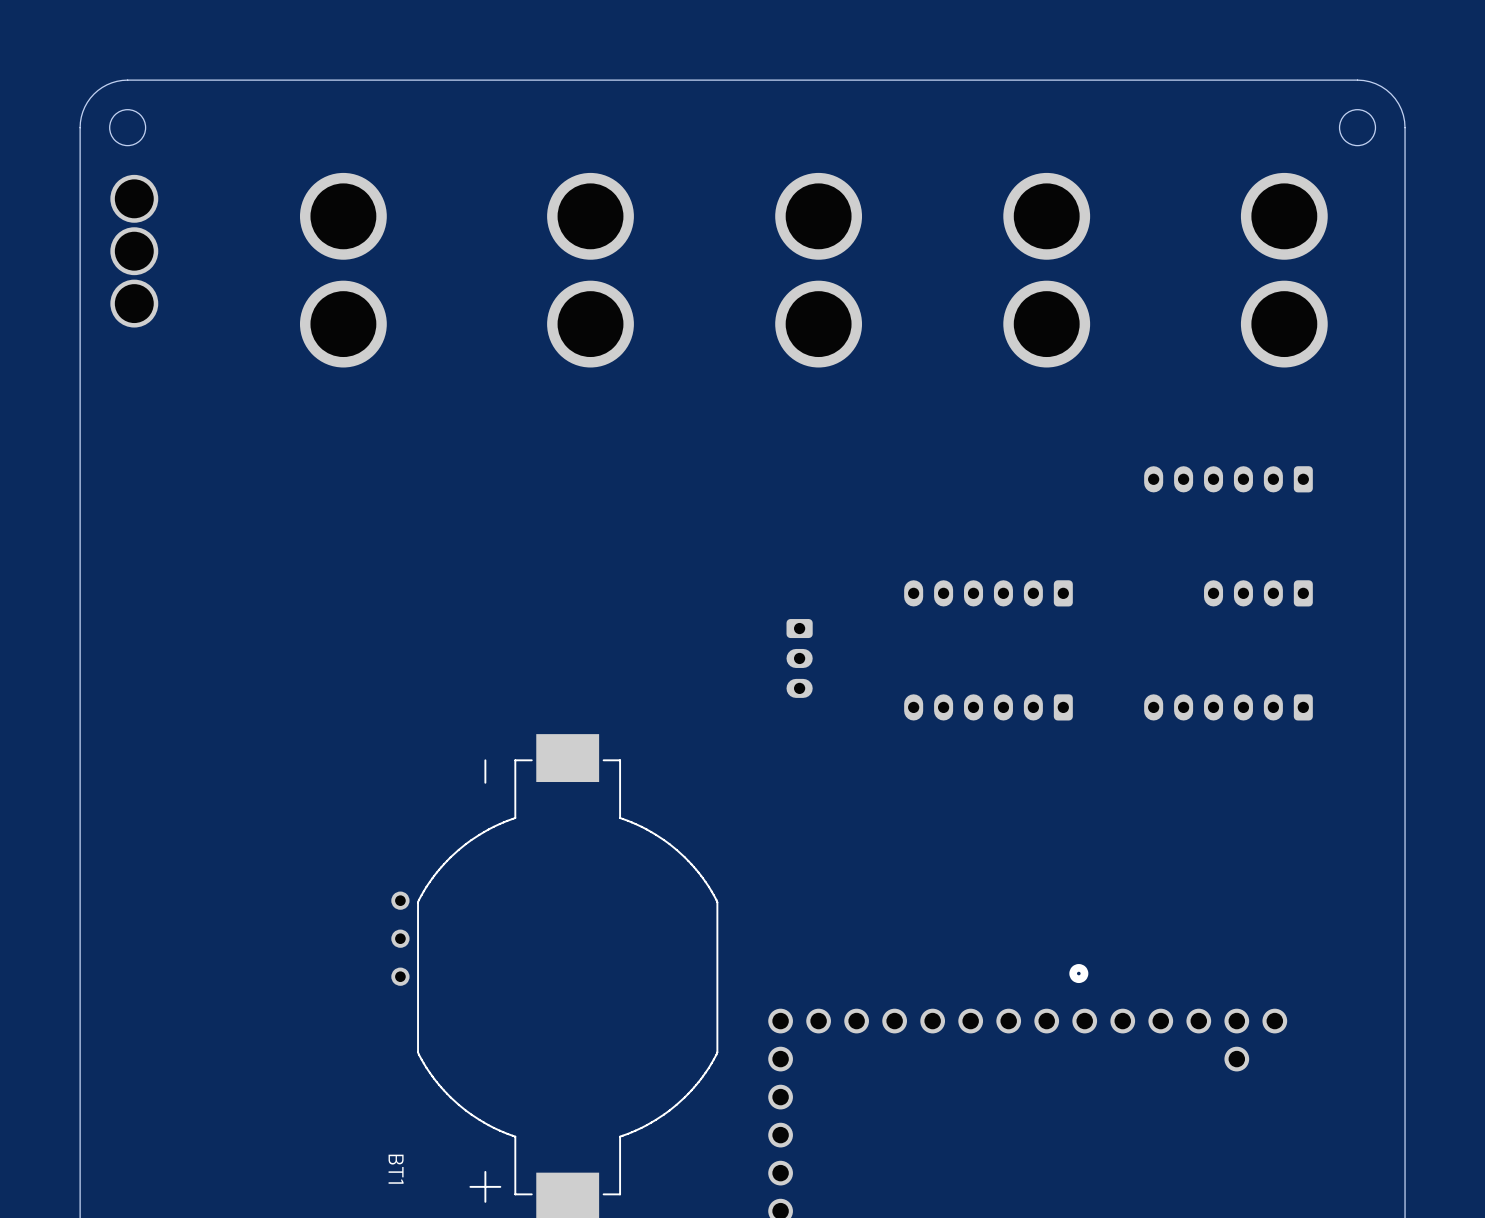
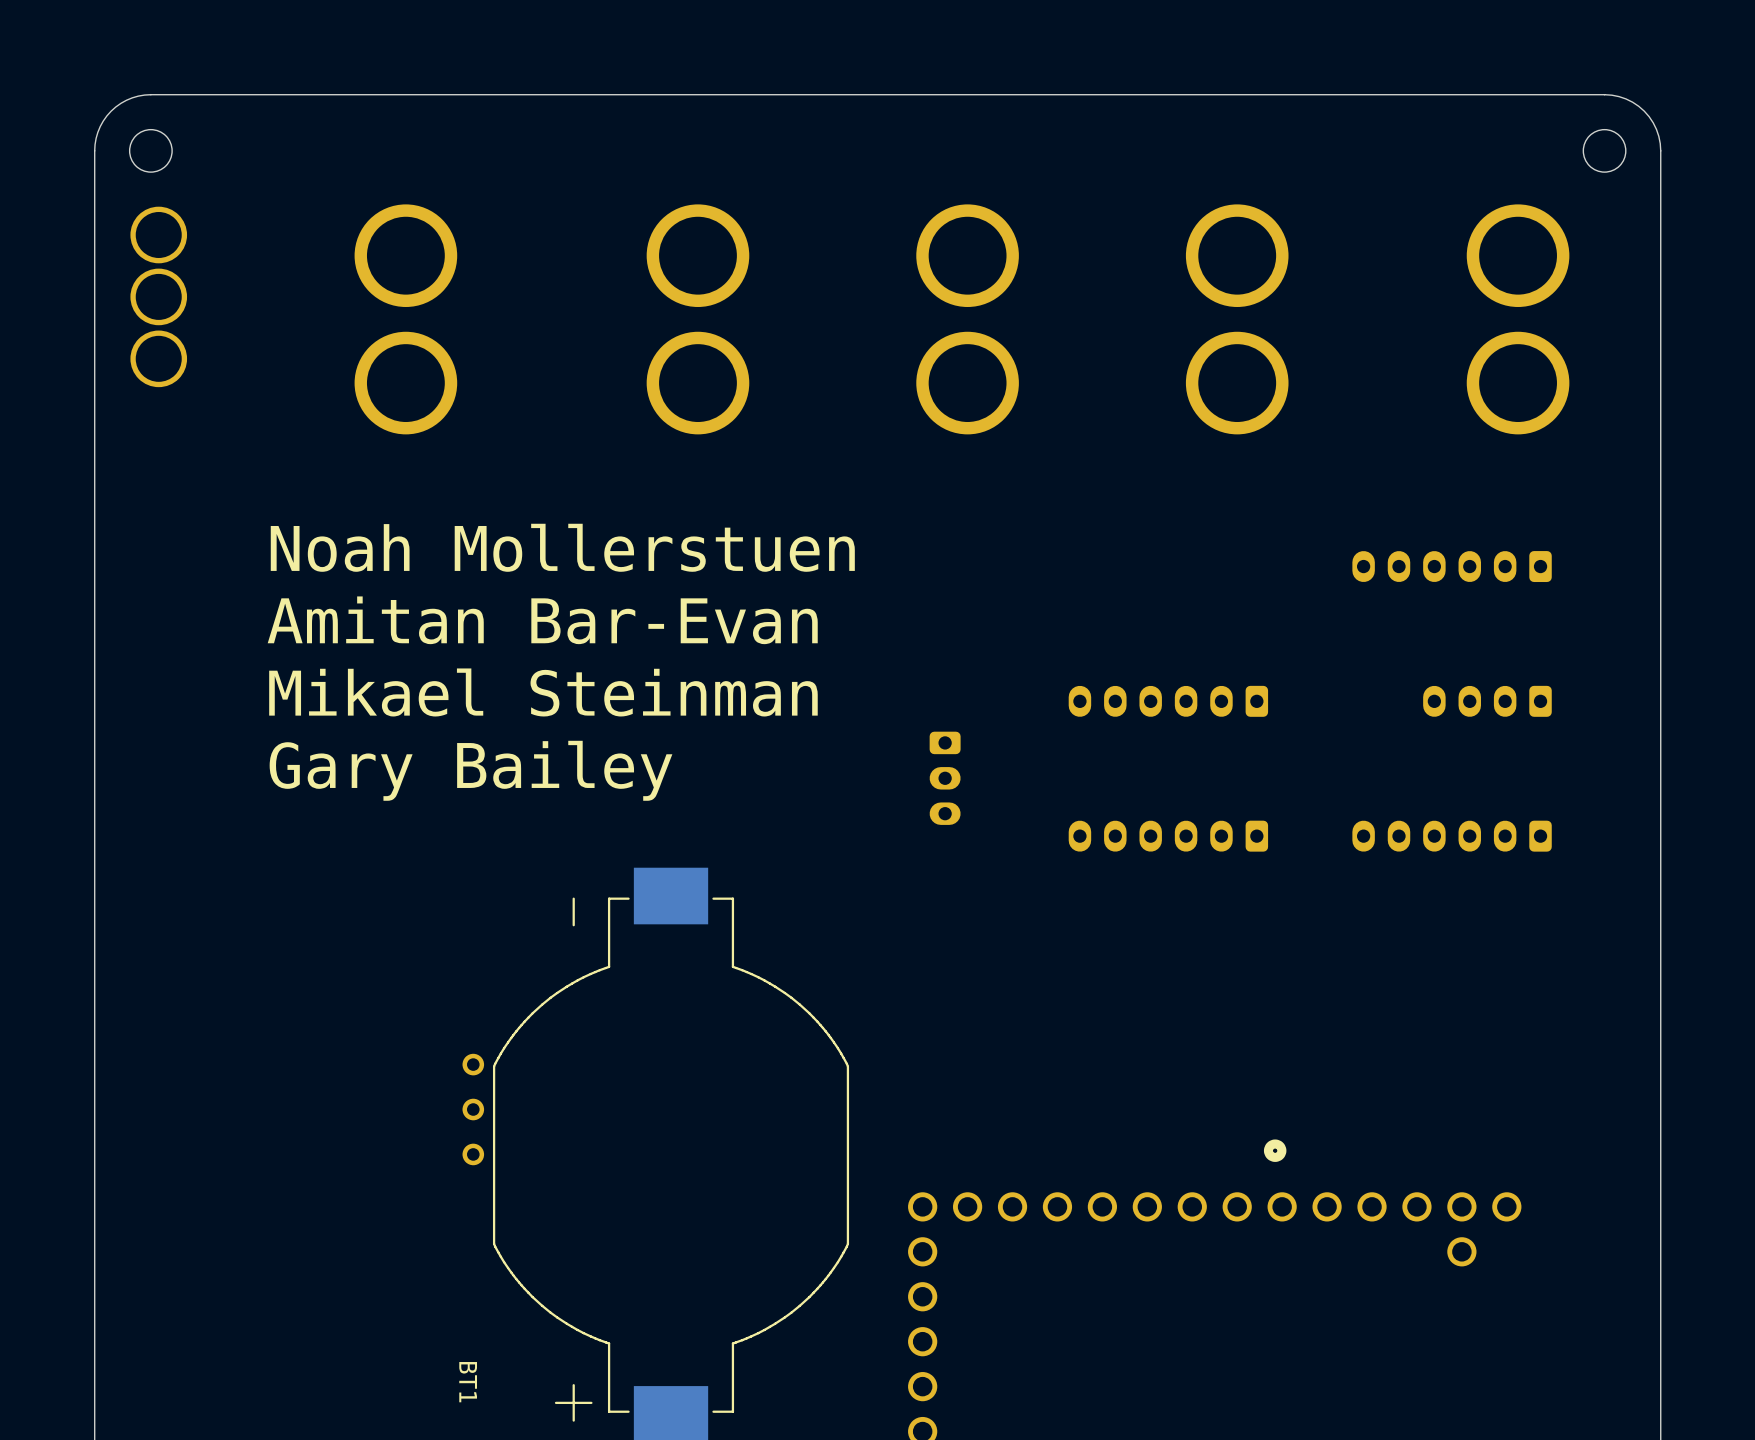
text: none -> Noah Mollerstuen (562, 547)
text: none -> Amitan Bar-Evan (542, 620)
text: none -> Mikael Steinman (543, 692)
text: none -> Gary Bailey (471, 770)

